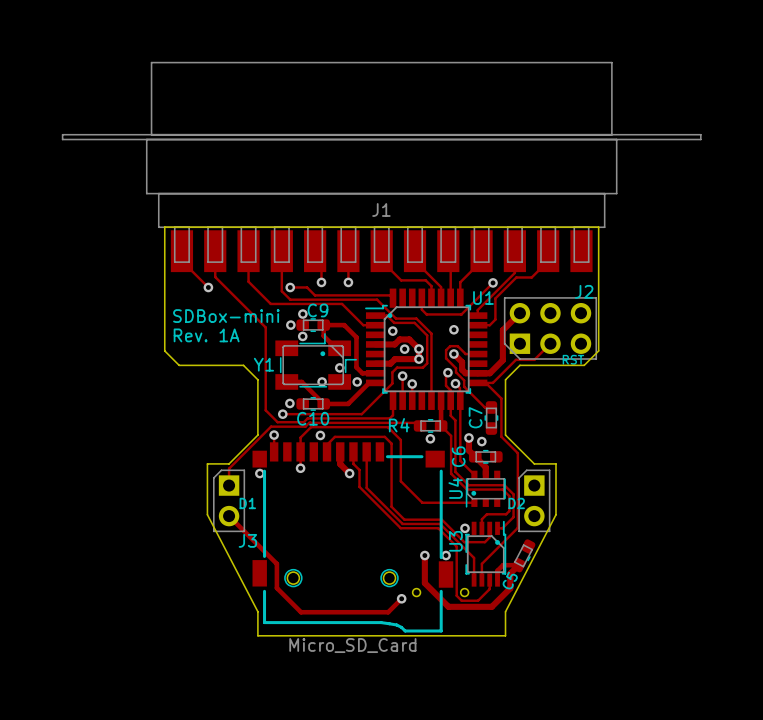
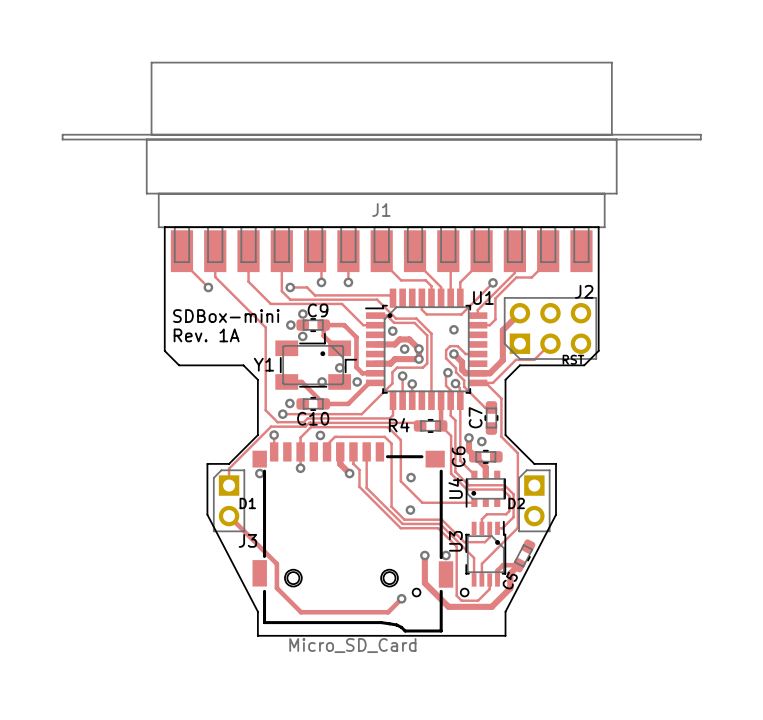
via: (430, 438) -> none
via: none -> (411, 477)
via: none -> (410, 510)
via: (465, 528) -> none

